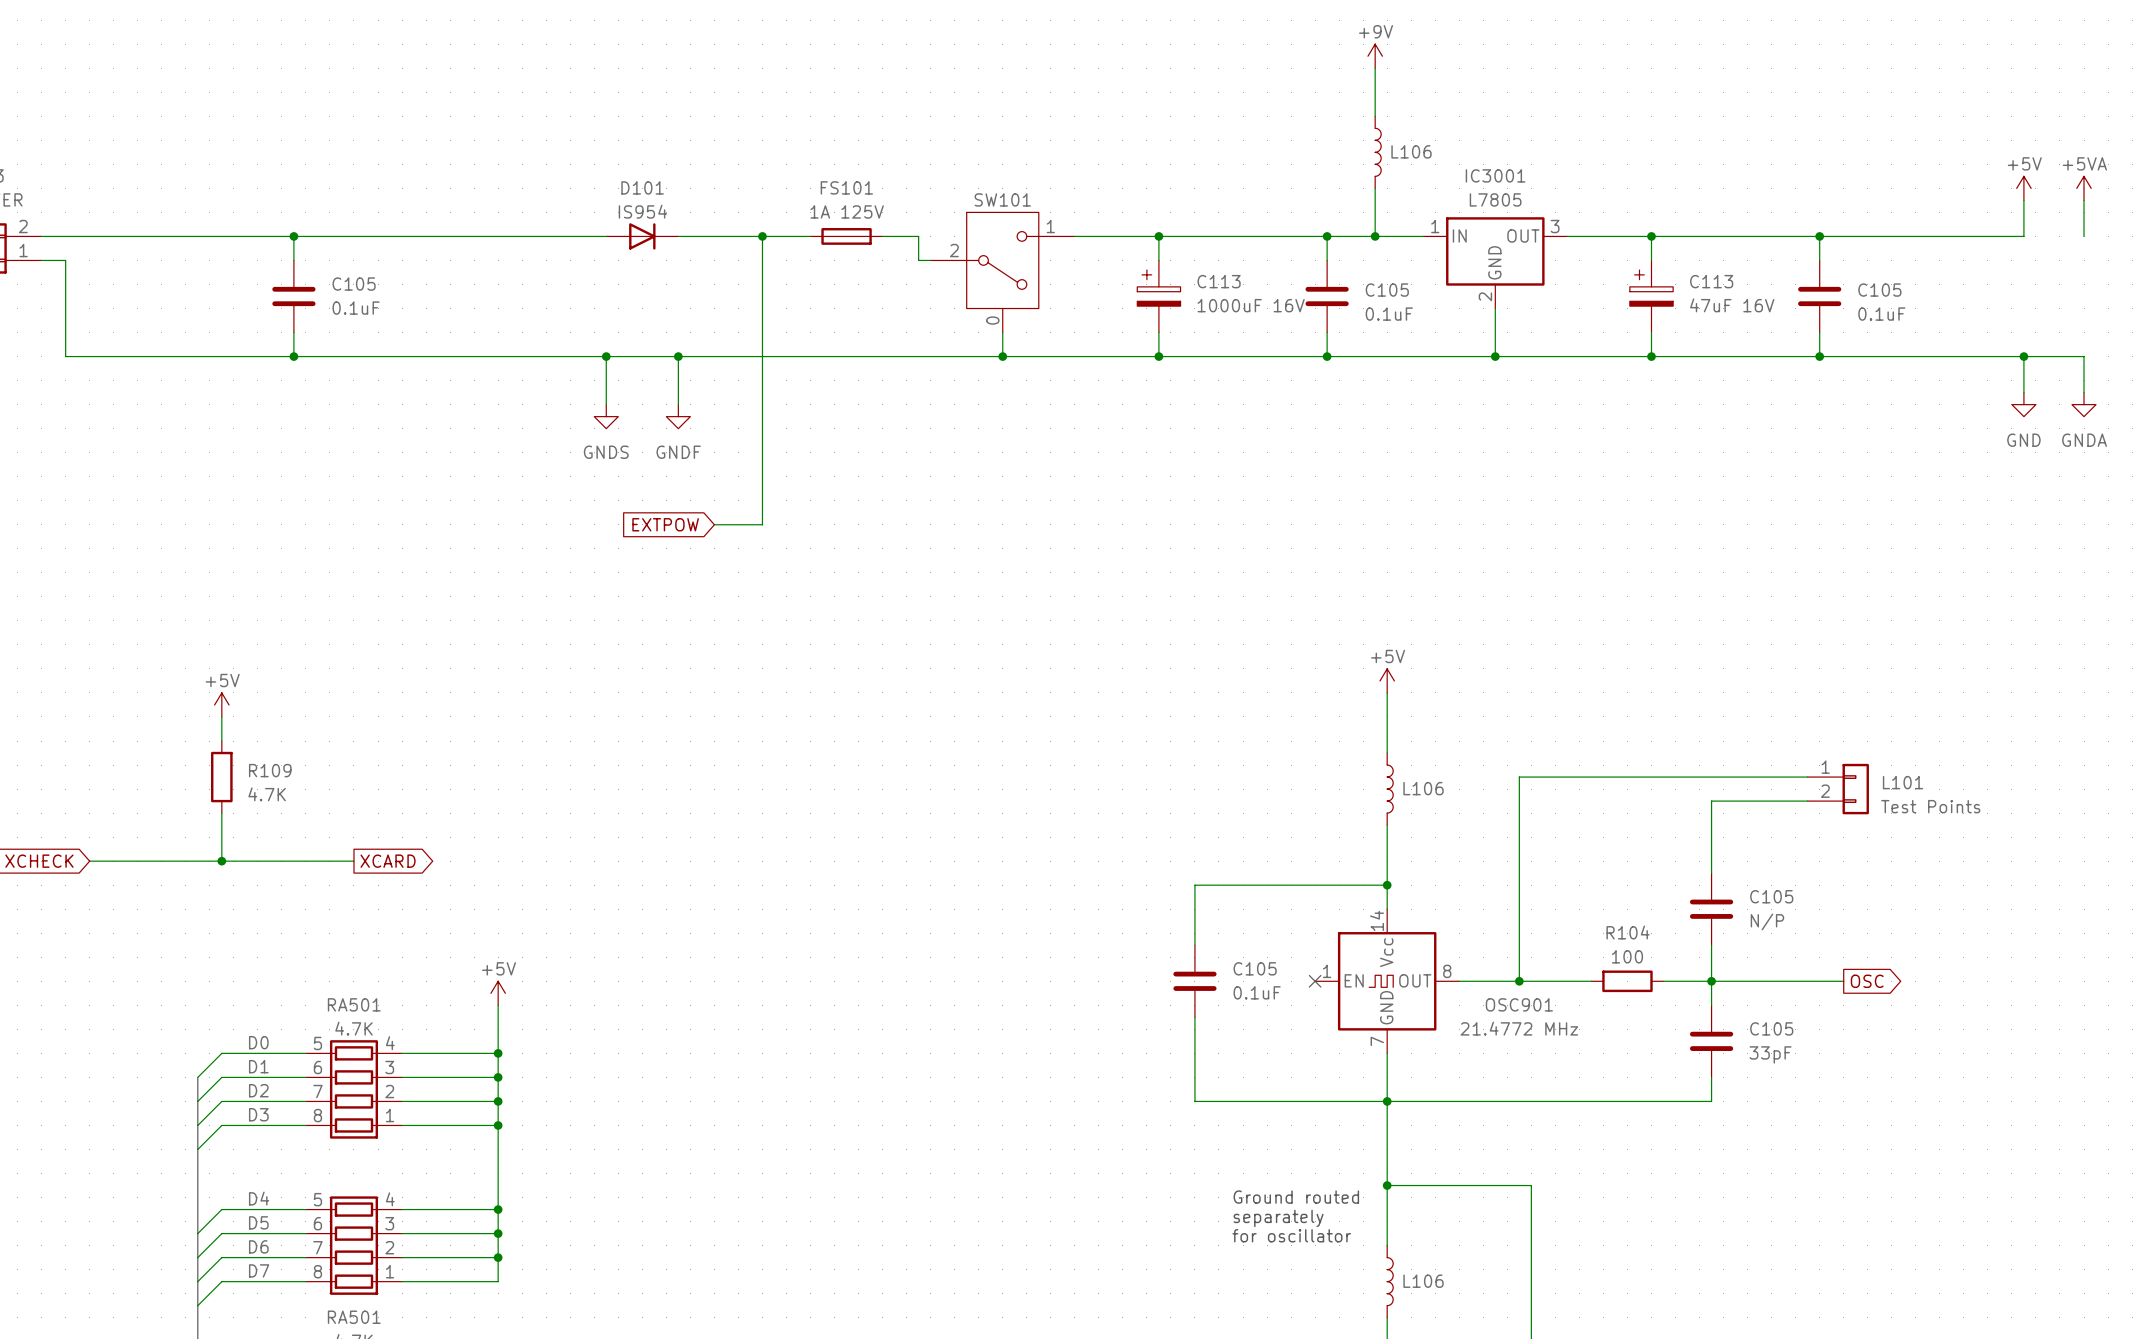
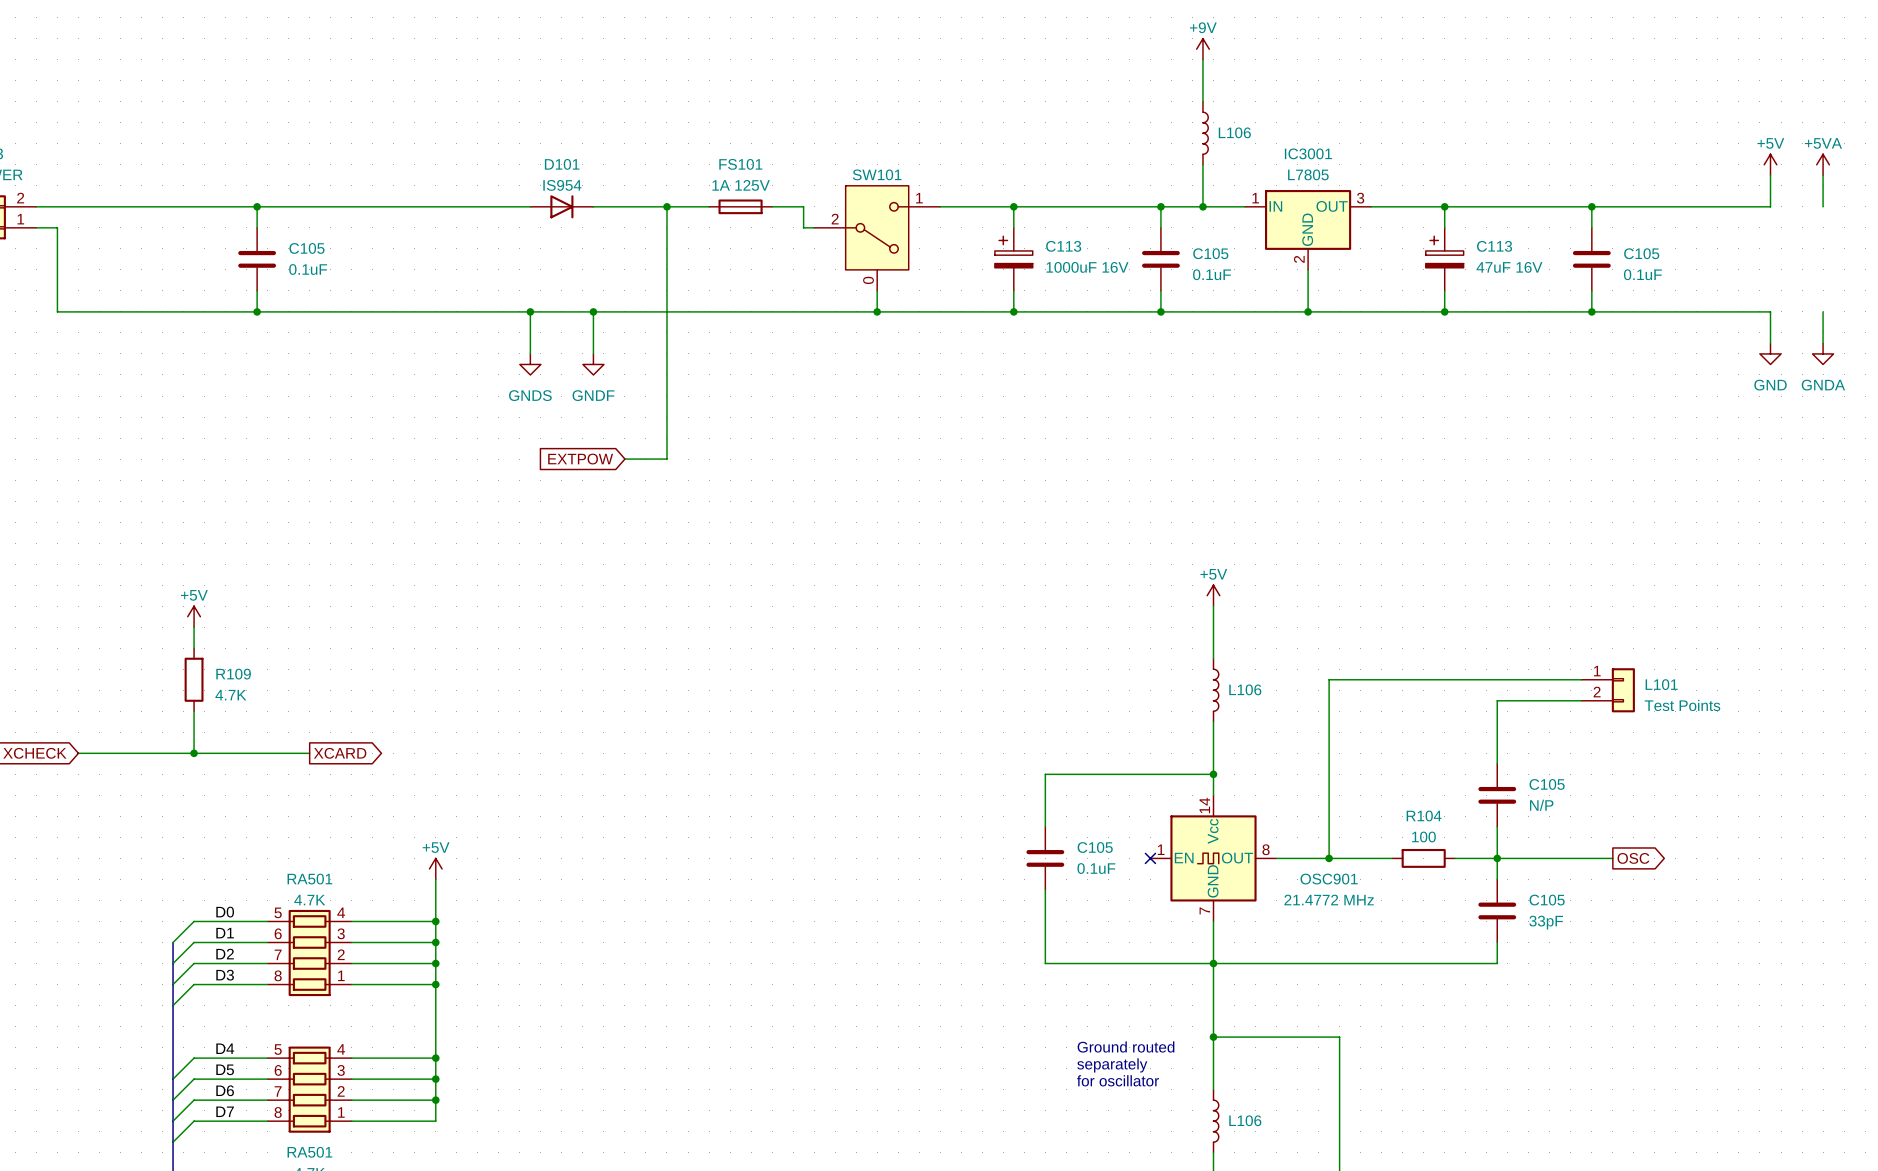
wire: (2023, 356) (2084, 356) -> none
junction: (2023, 356) -> none

